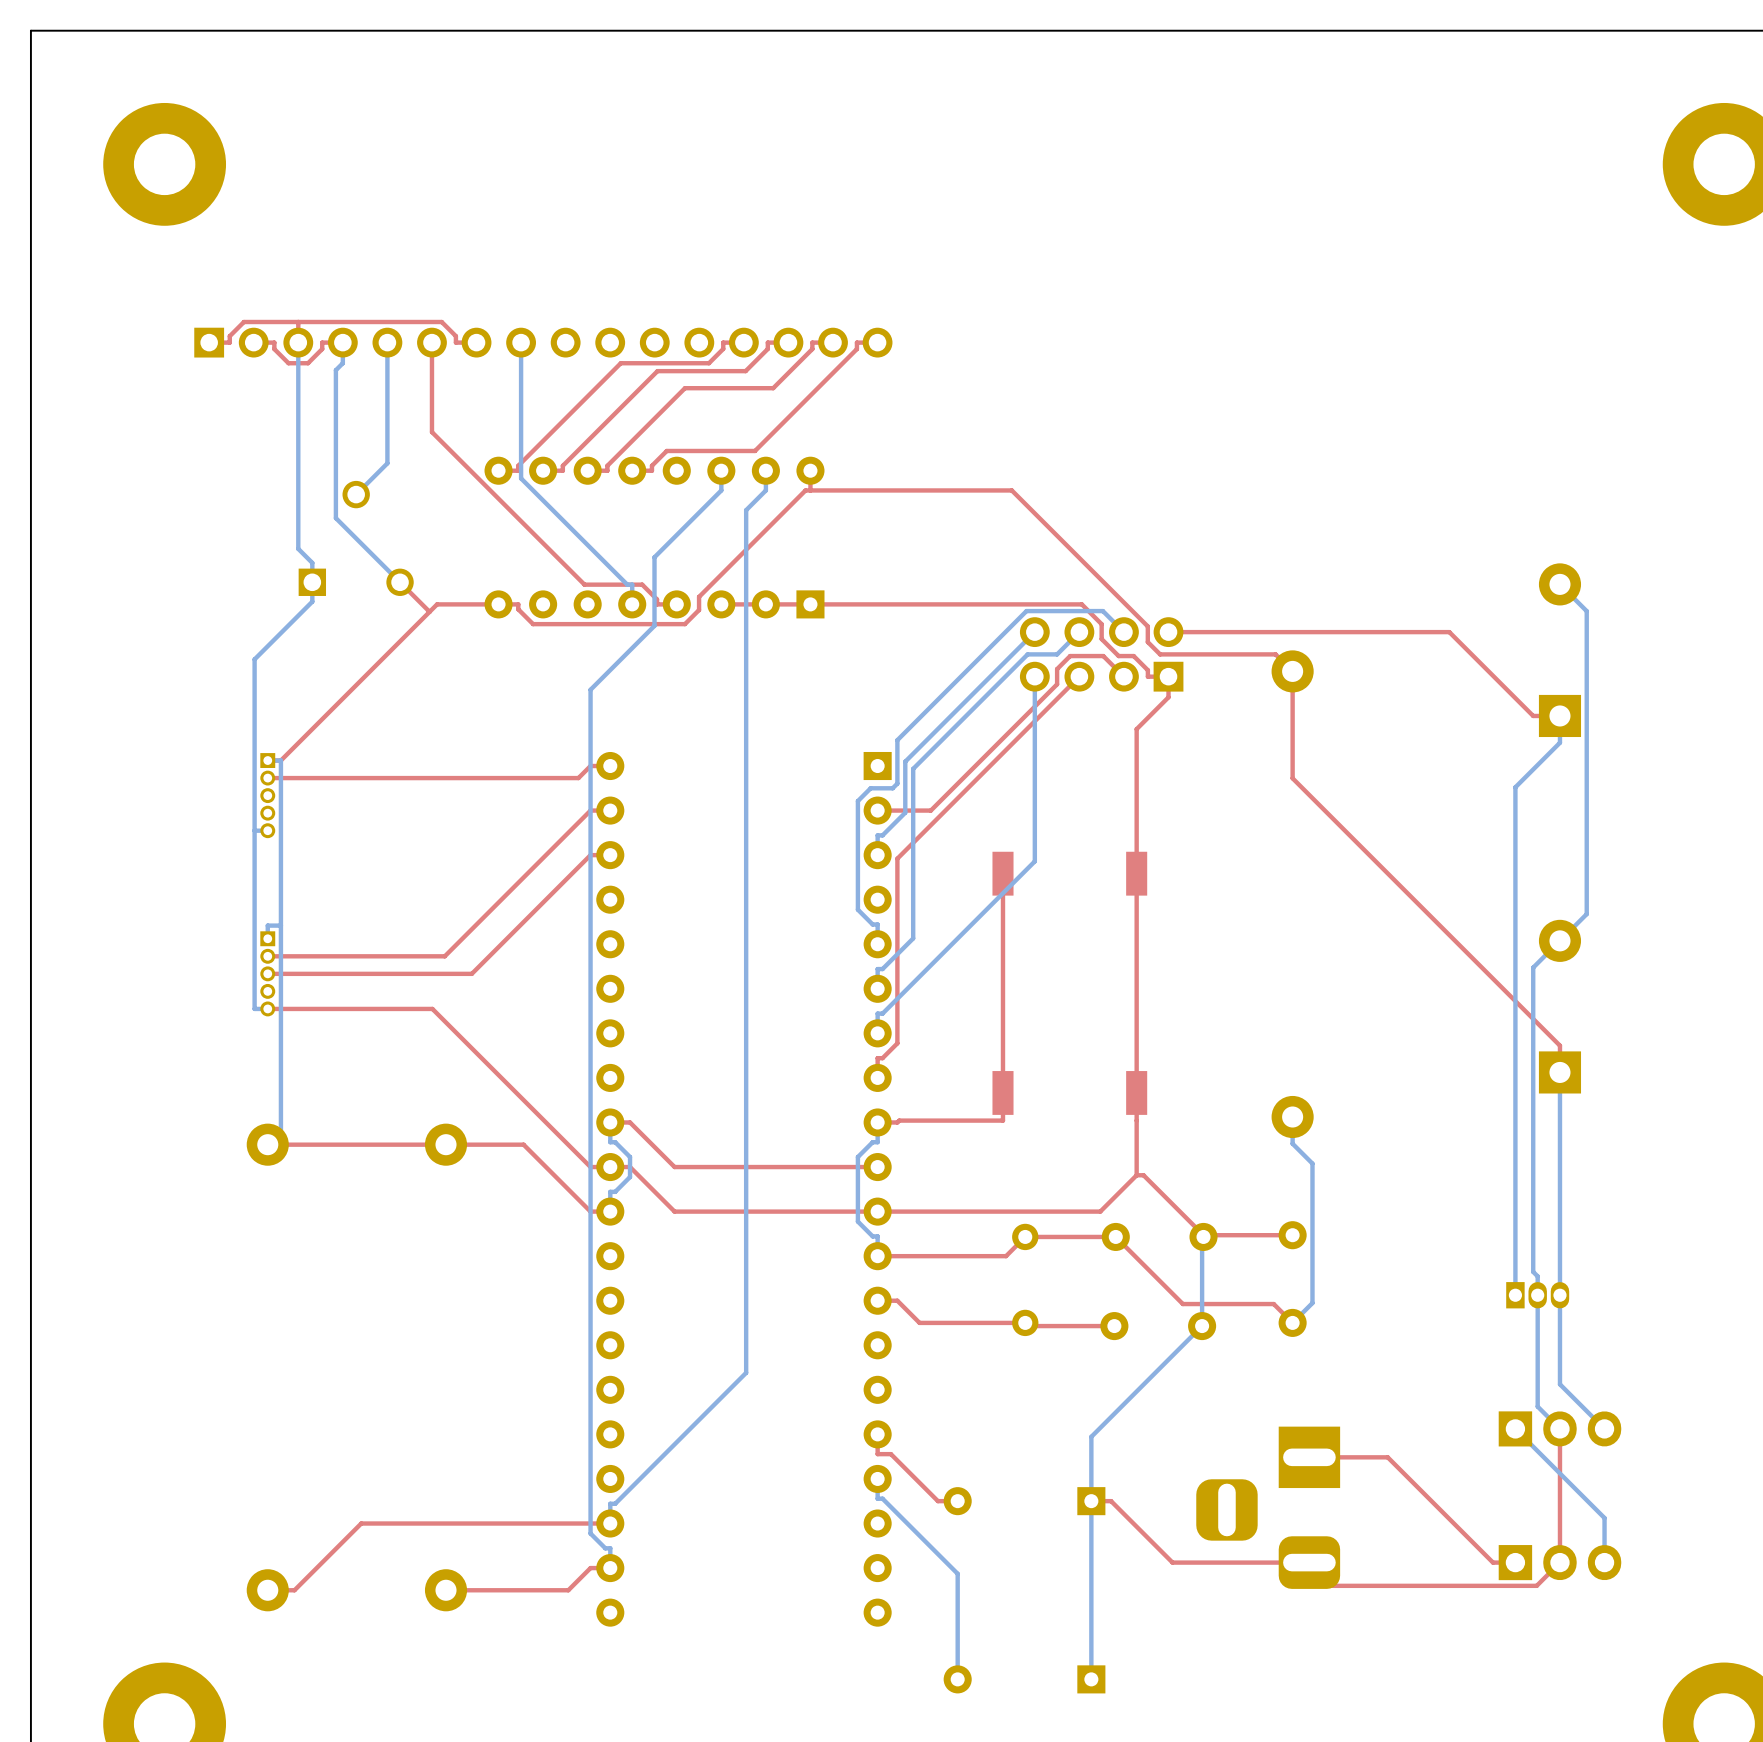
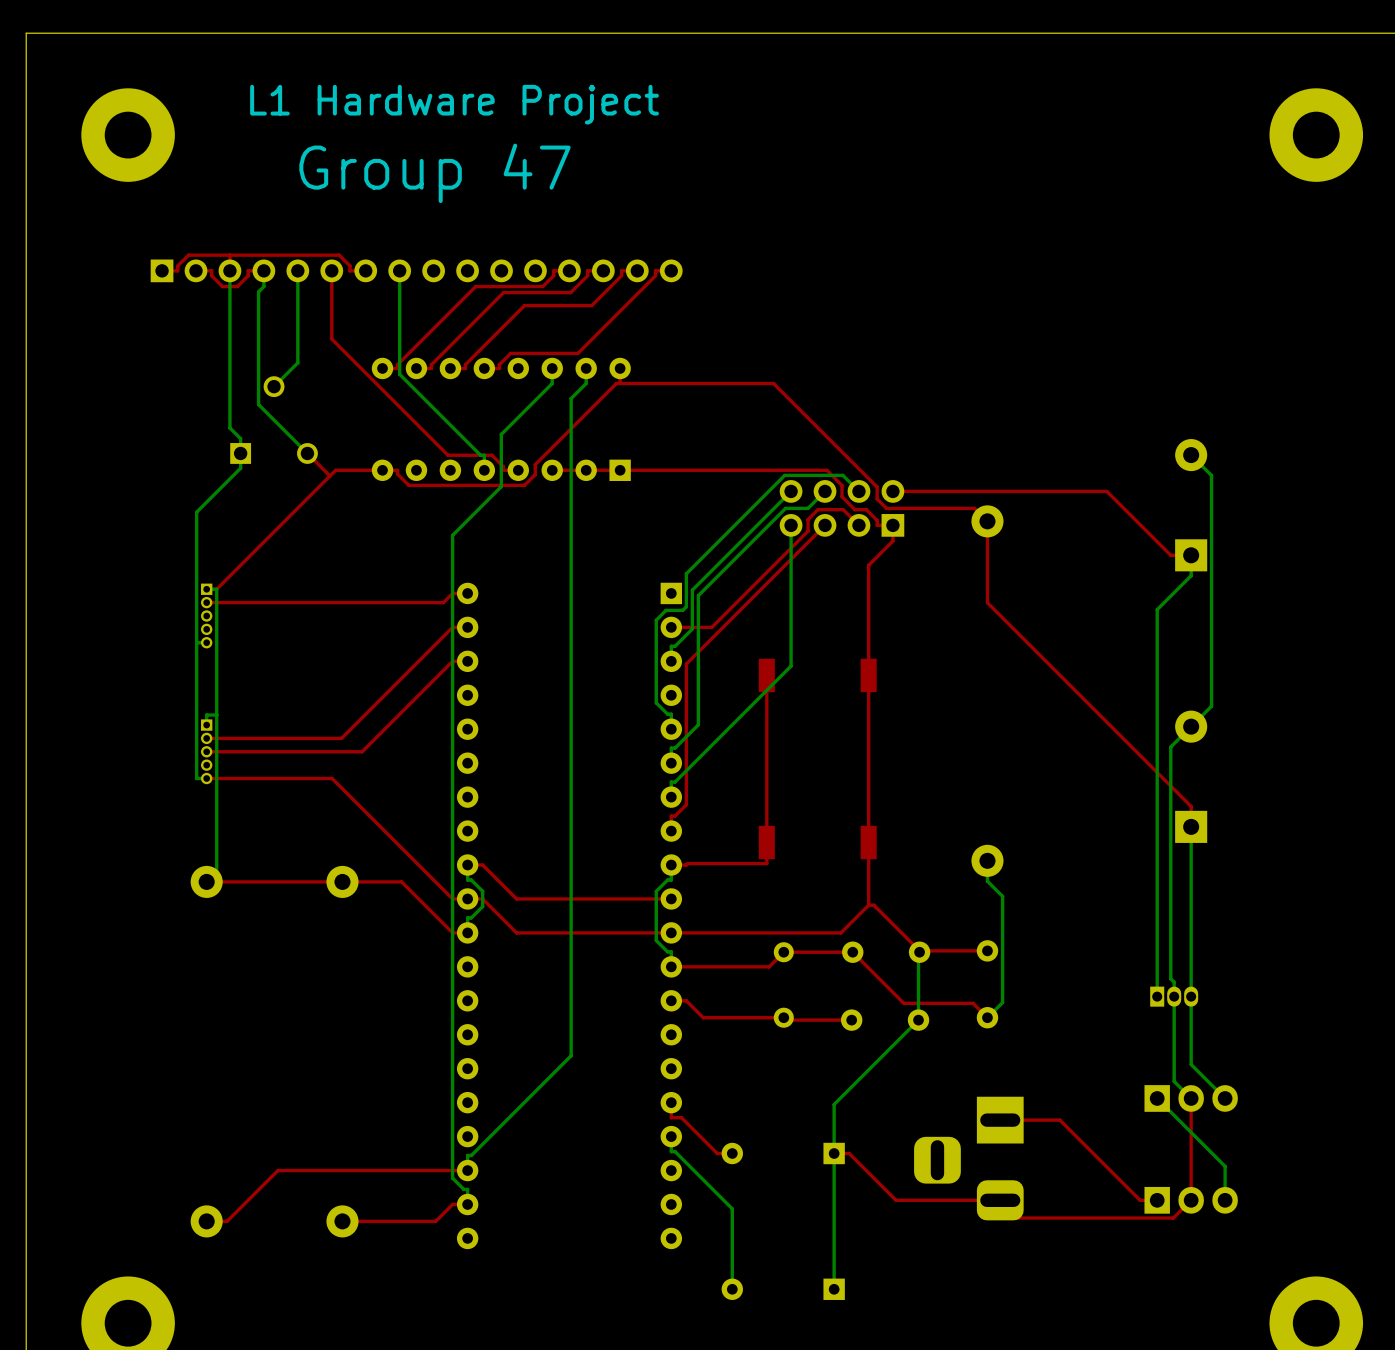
text: none -> L1 Hardware Project (454, 104)
text: none -> Group 47 (434, 173)

